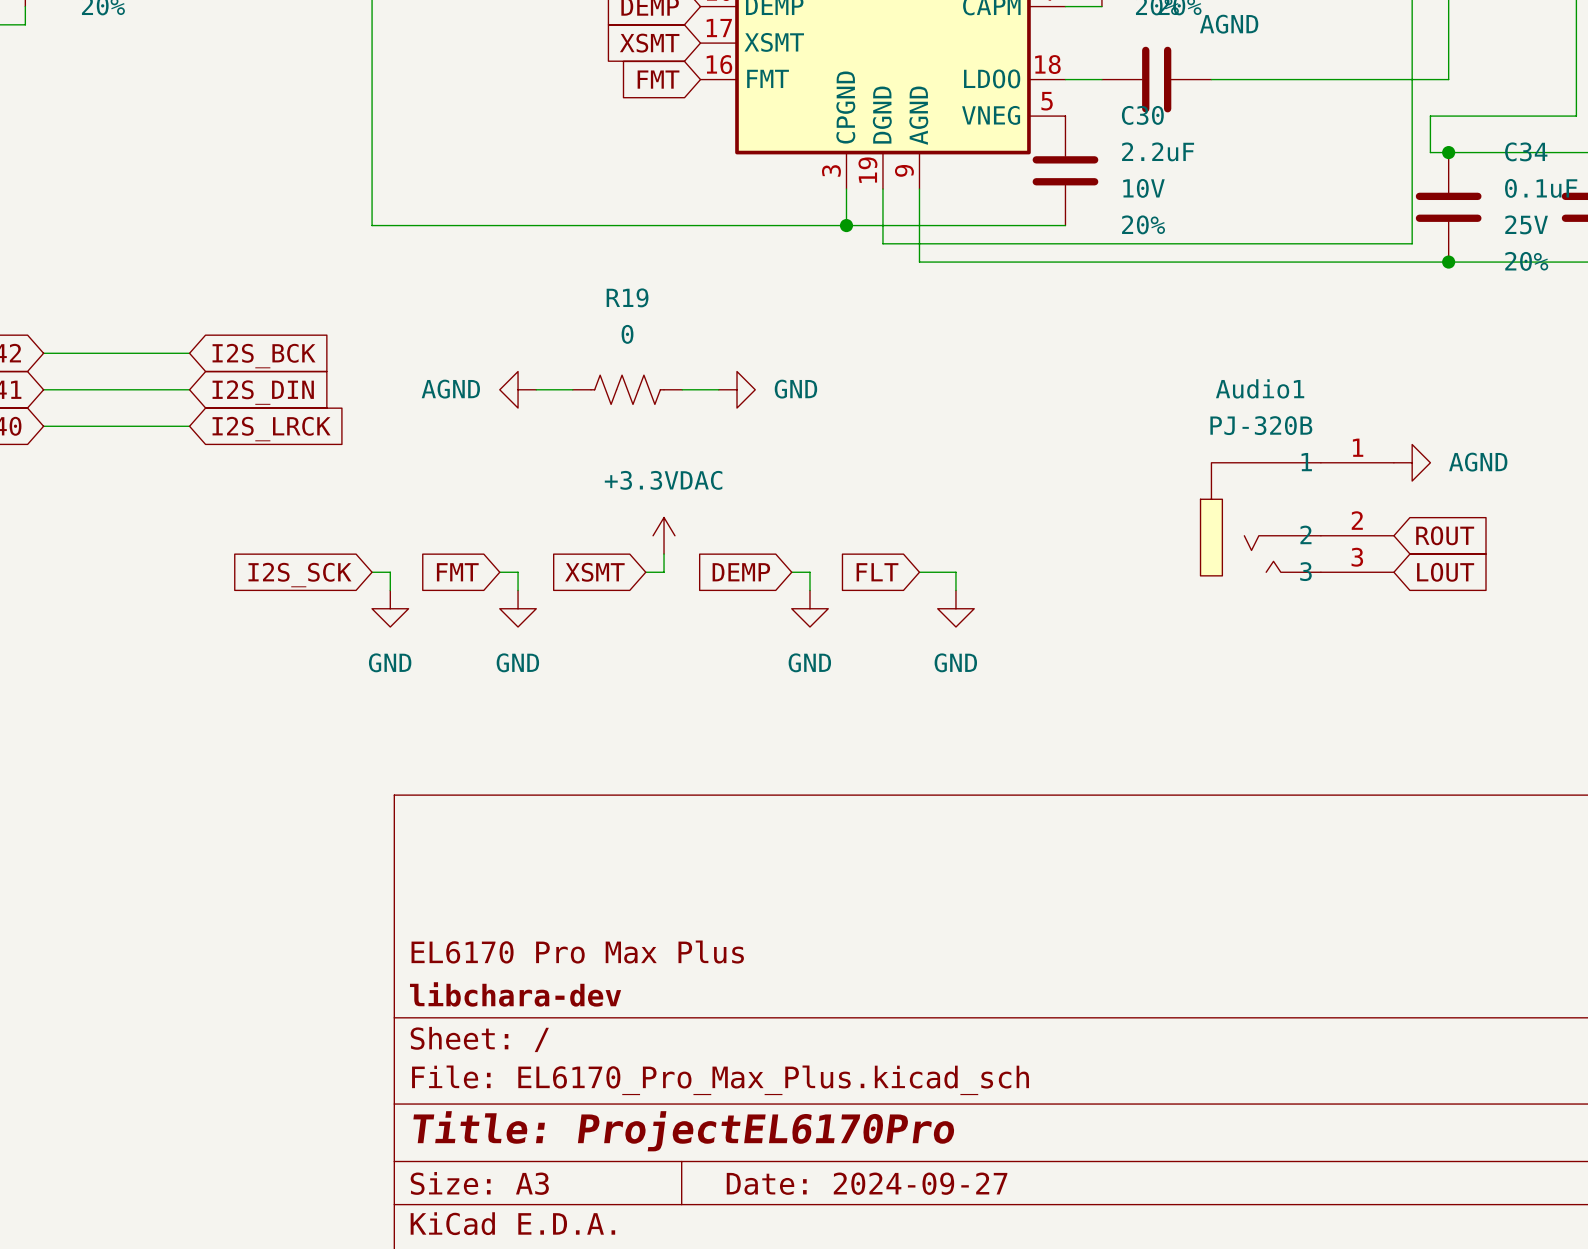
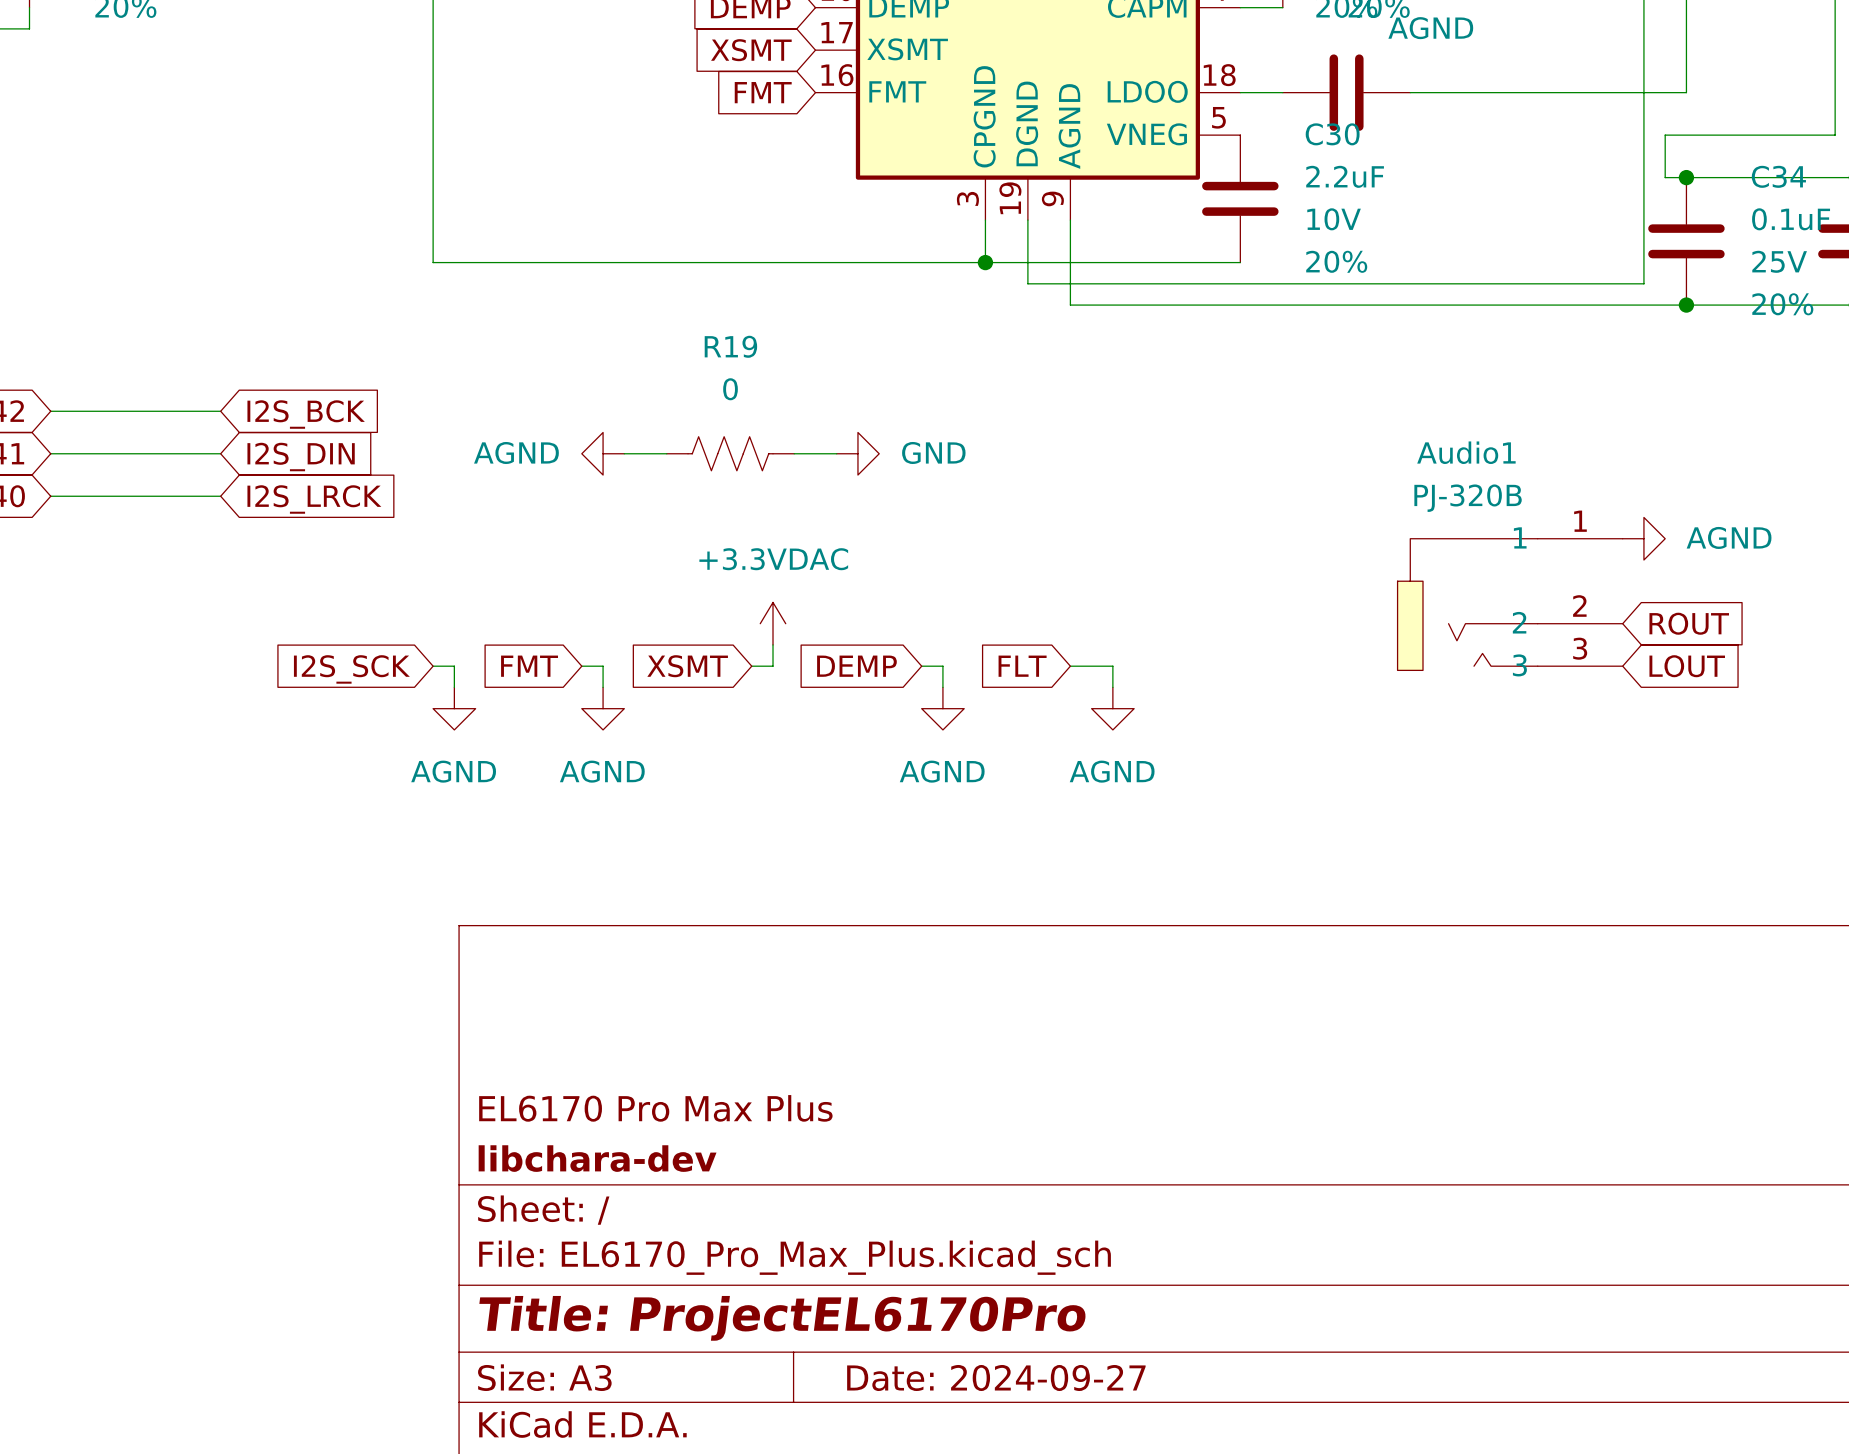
power symbol: GND (390, 608) -> AGND (454, 708)
power symbol: GND (518, 608) -> AGND (603, 708)
power symbol: GND (809, 608) -> AGND (942, 708)
power symbol: GND (955, 608) -> AGND (1112, 708)

